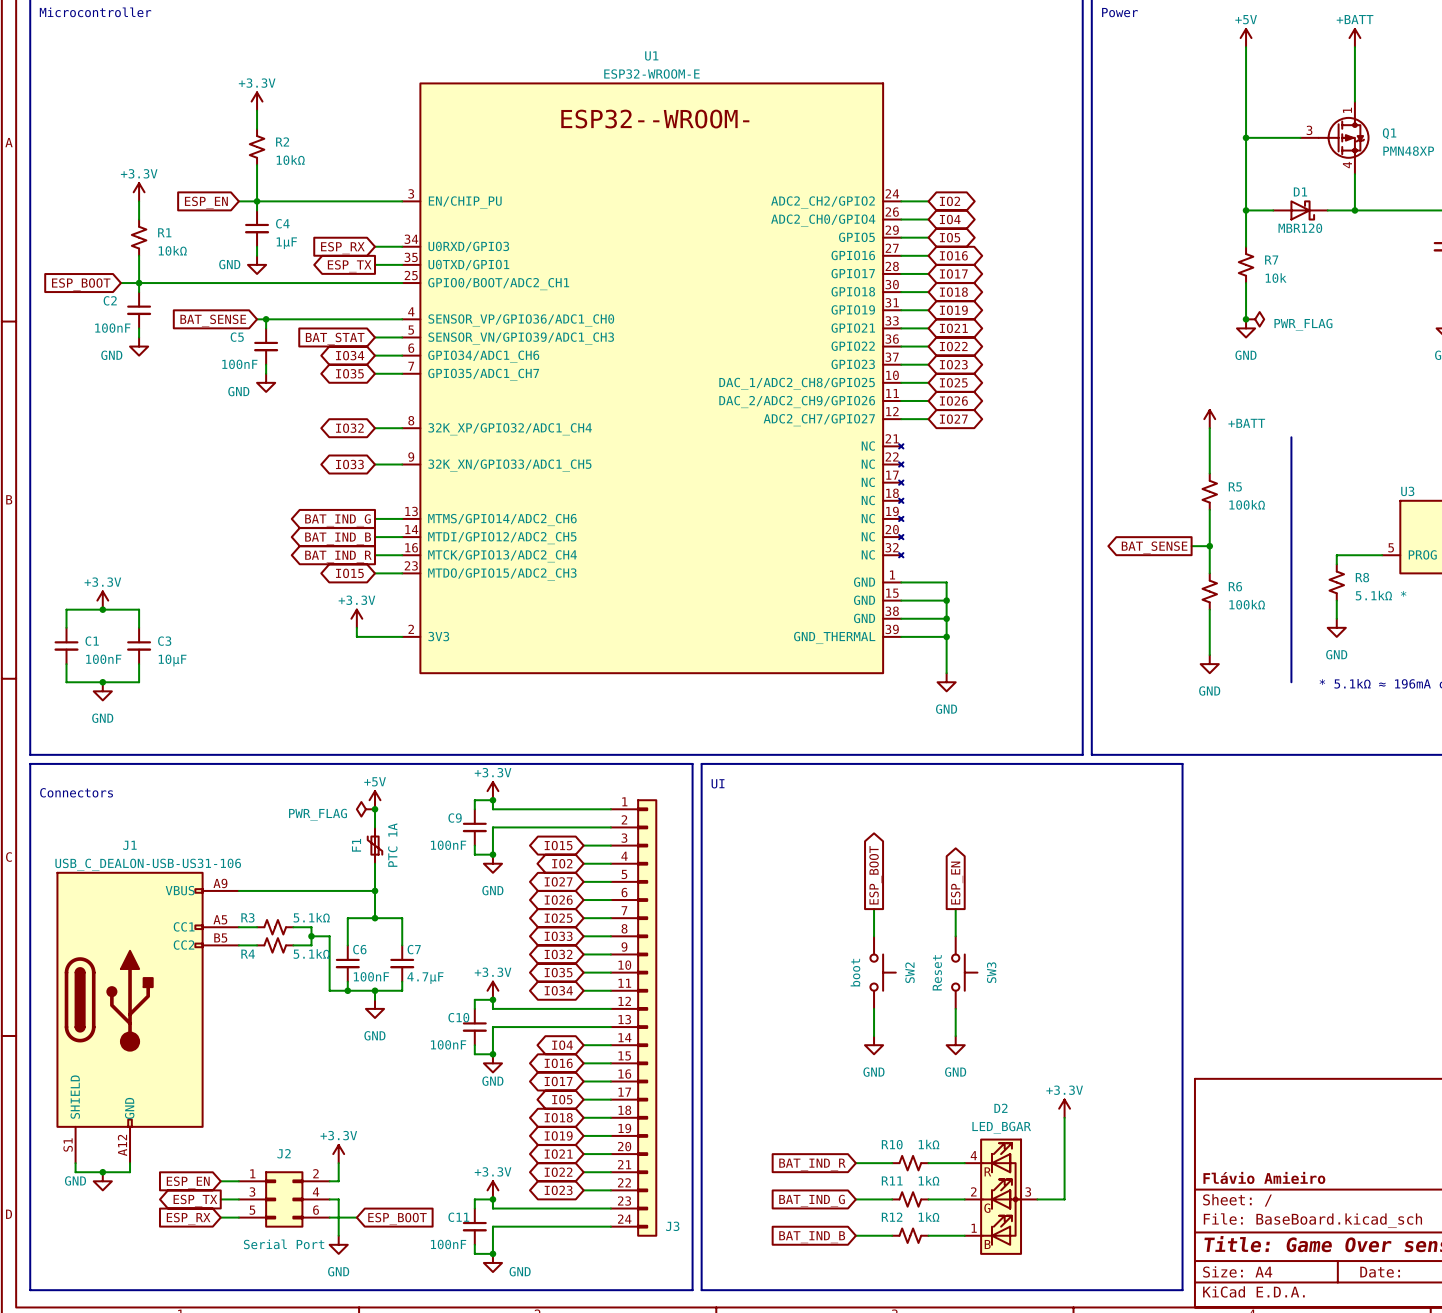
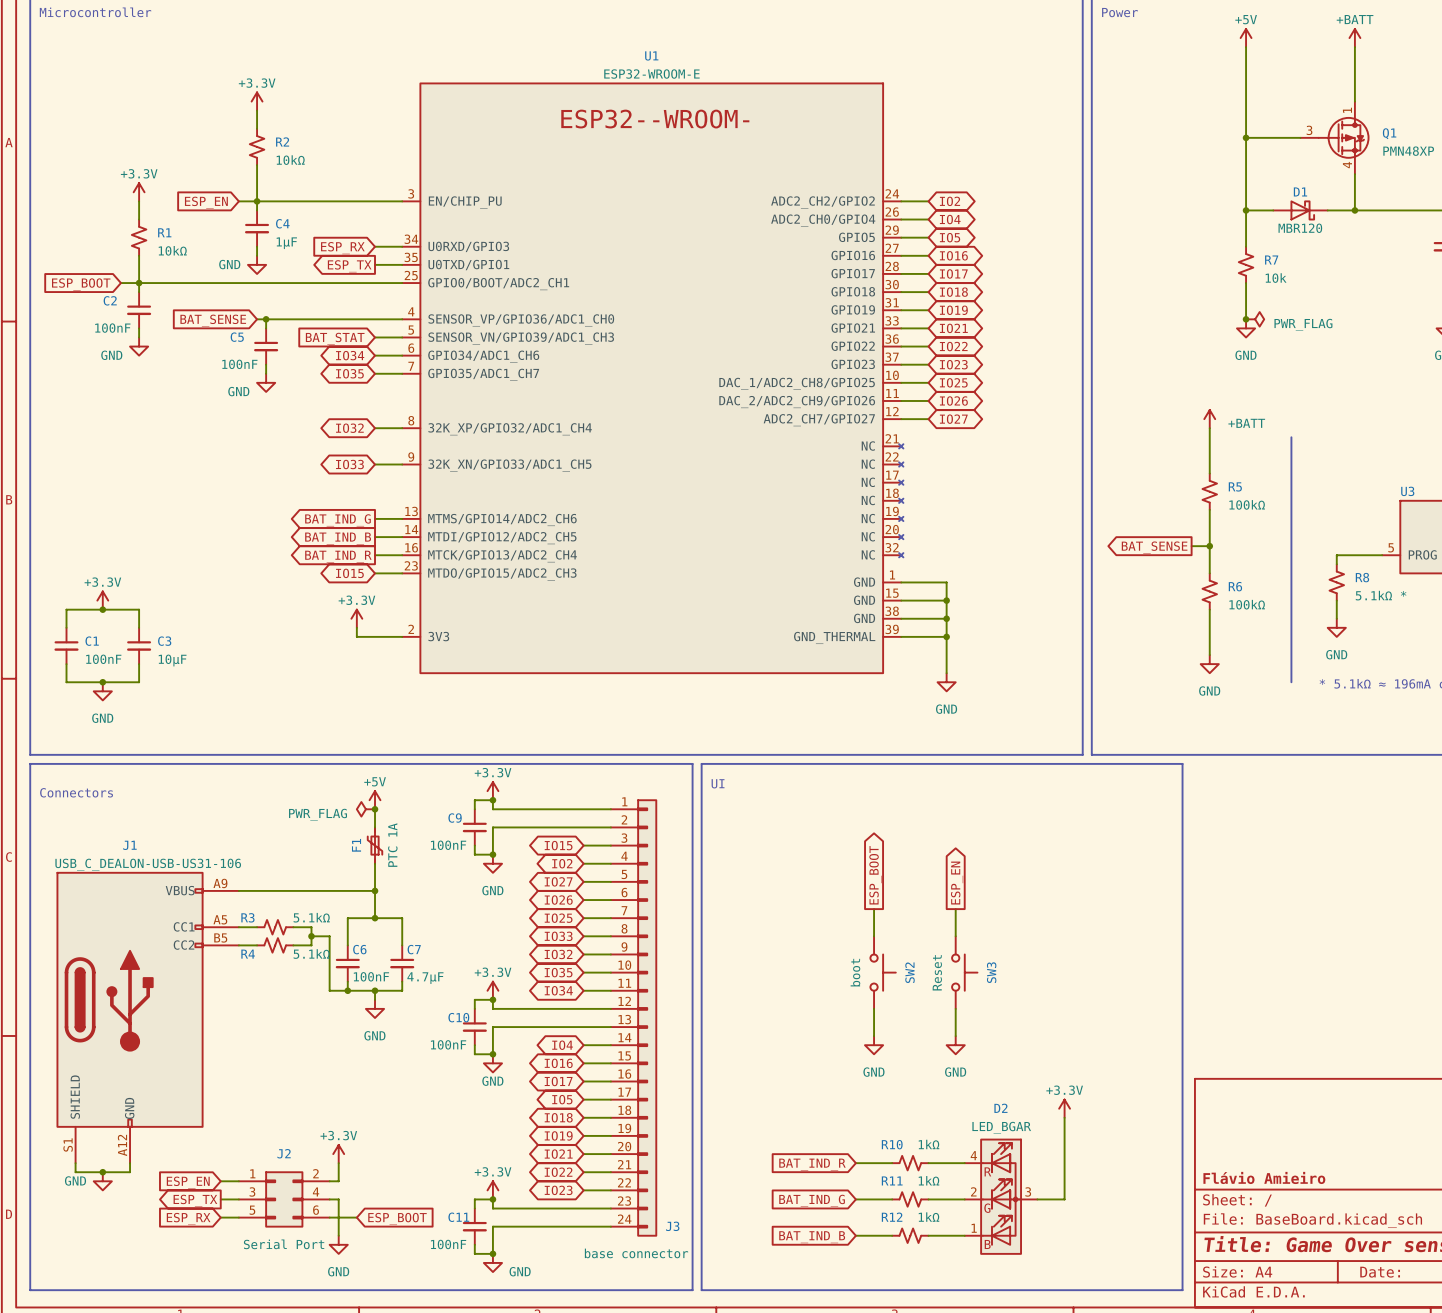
J3 value: none -> base connector (636, 1253)

